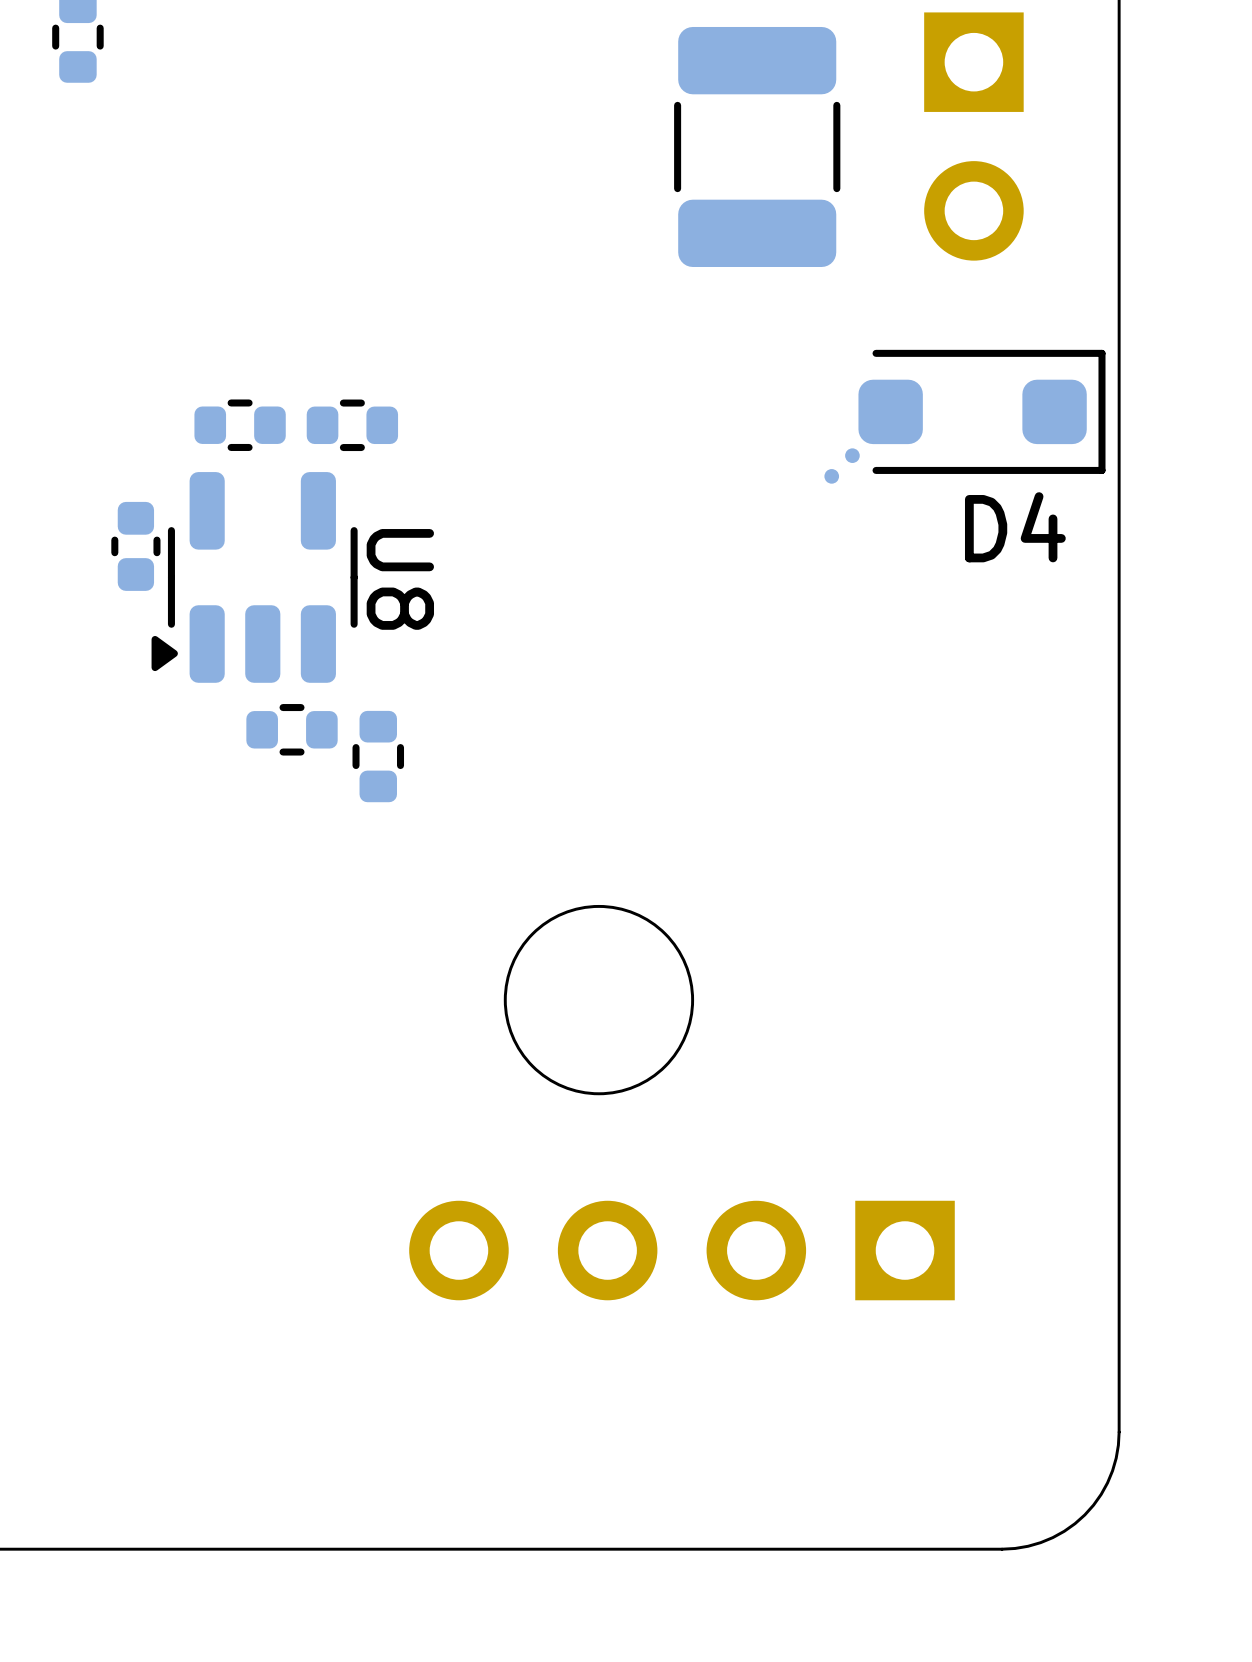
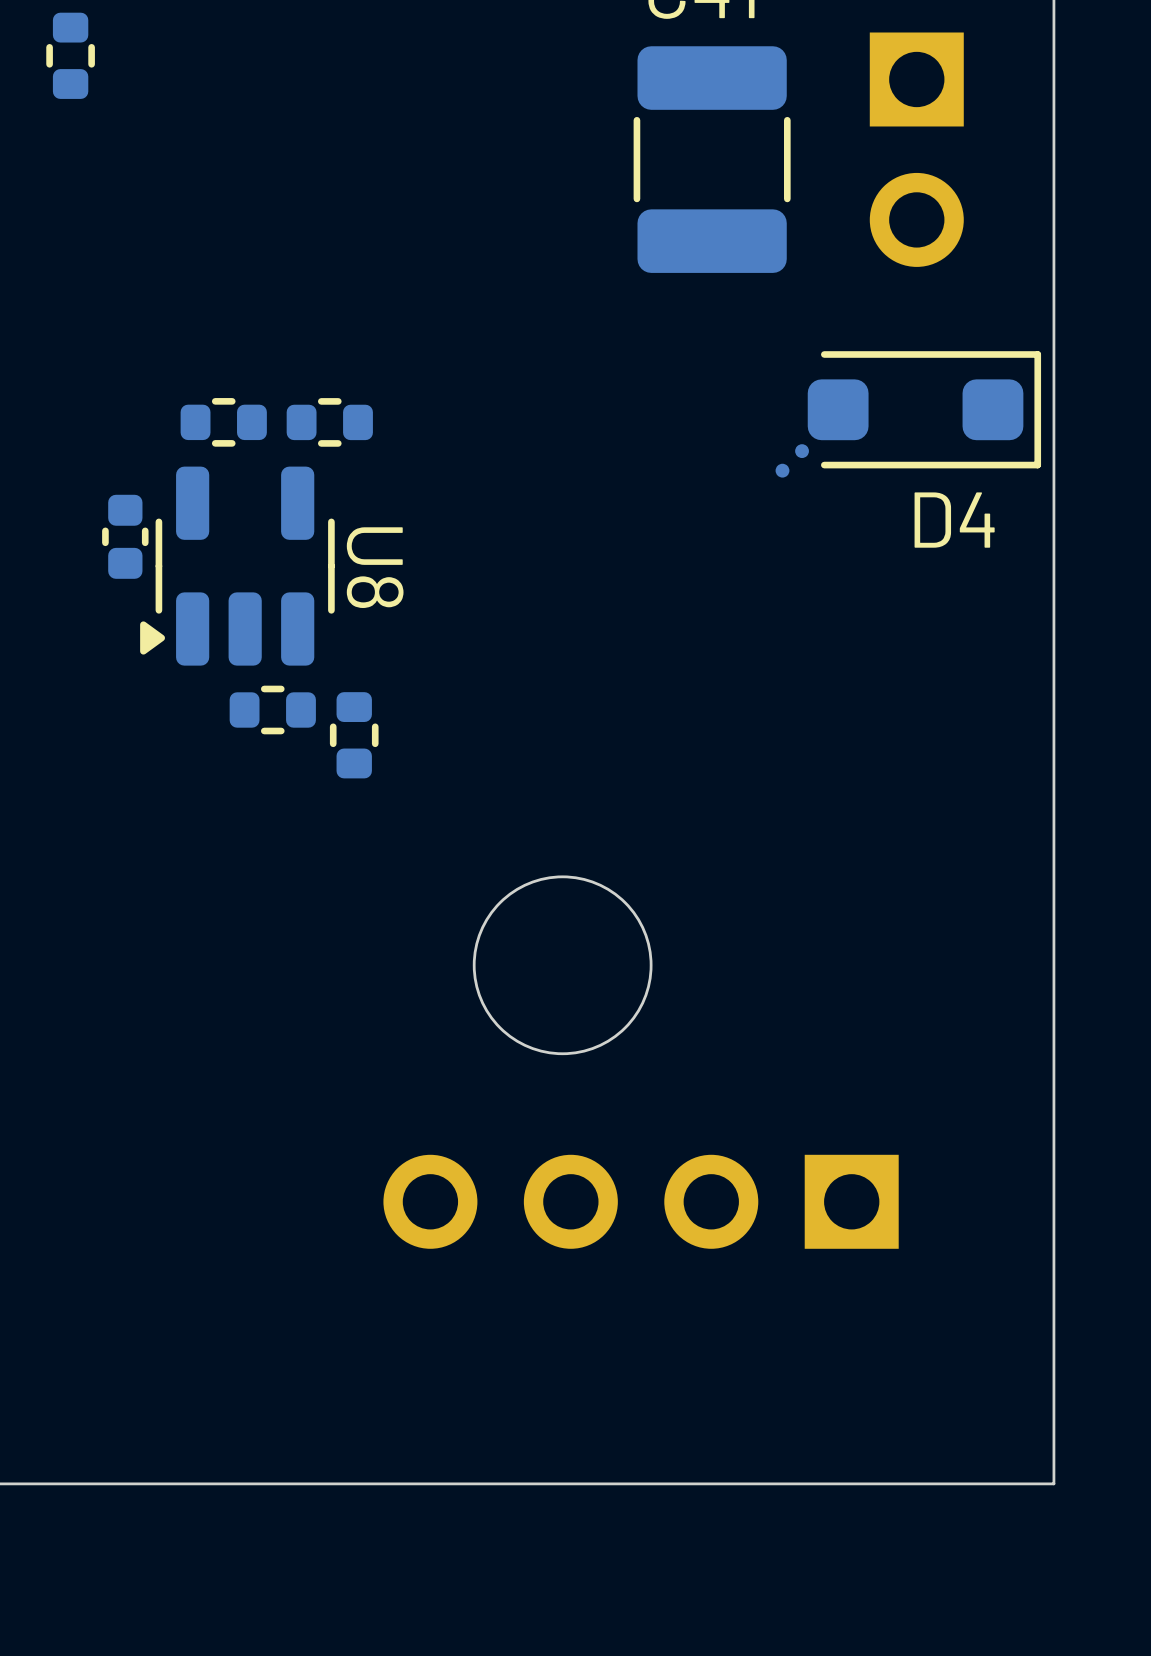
board edge: (1119, 1432) (1116, 1458) (1107, 1482) (1084, 1514) (1064, 1531) (1040, 1542) (1002, 1549) -> (1053, 1373) (1053, 1483) (943, 1483)

